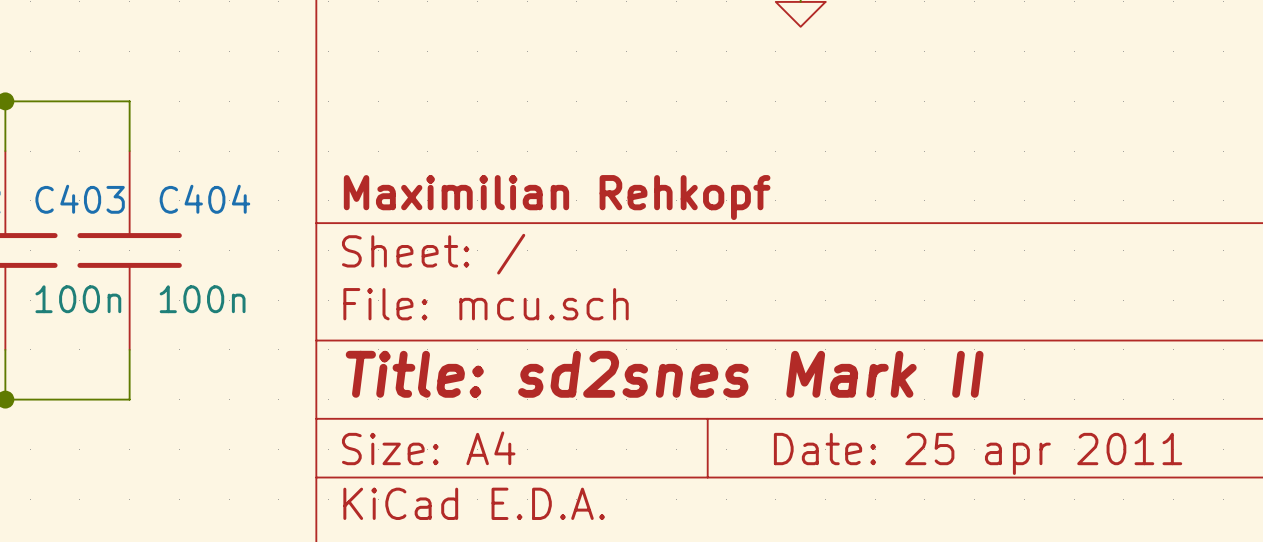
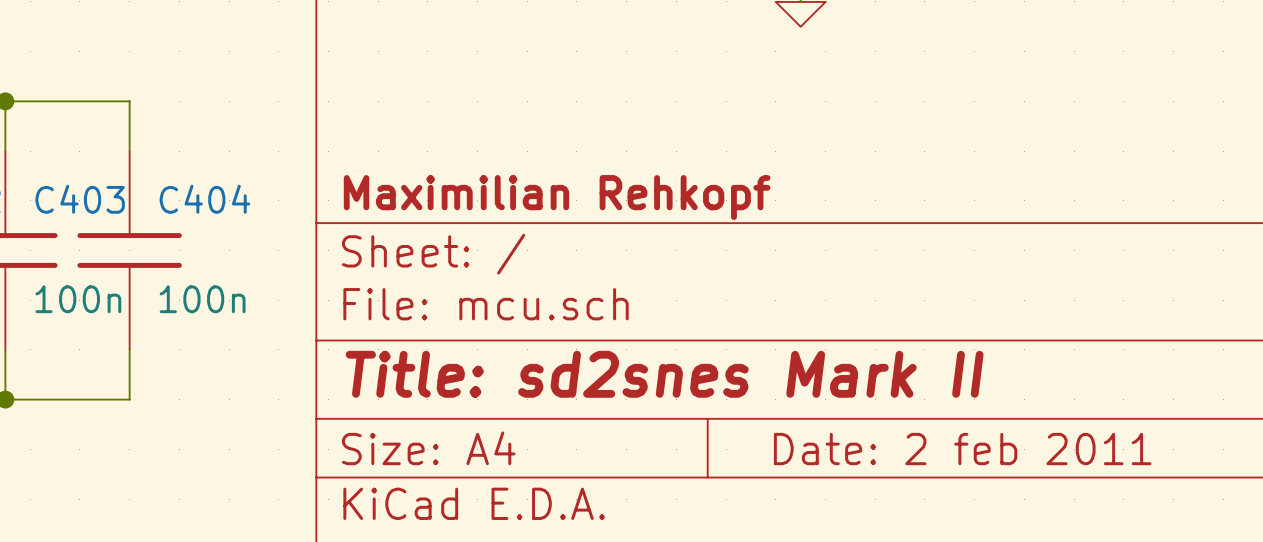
title block: Date: 25 apr 2011 (978, 453) -> Date: 2 feb 2011 (962, 449)

